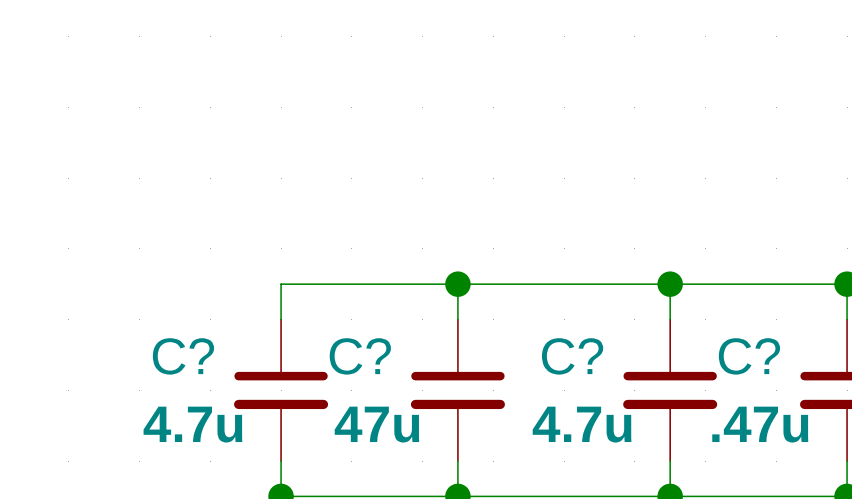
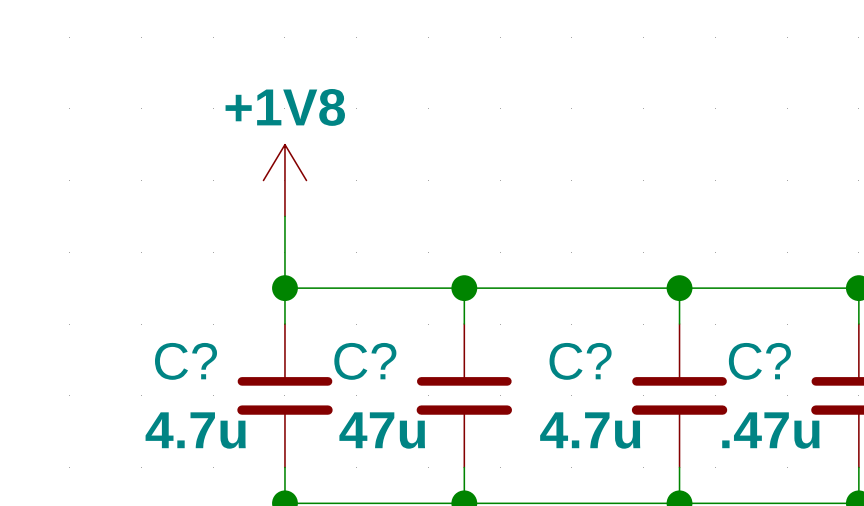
power symbol: none -> +1V8 (284, 180)
wire: none -> (284, 216) (284, 288)
junction: none -> (284, 288)

